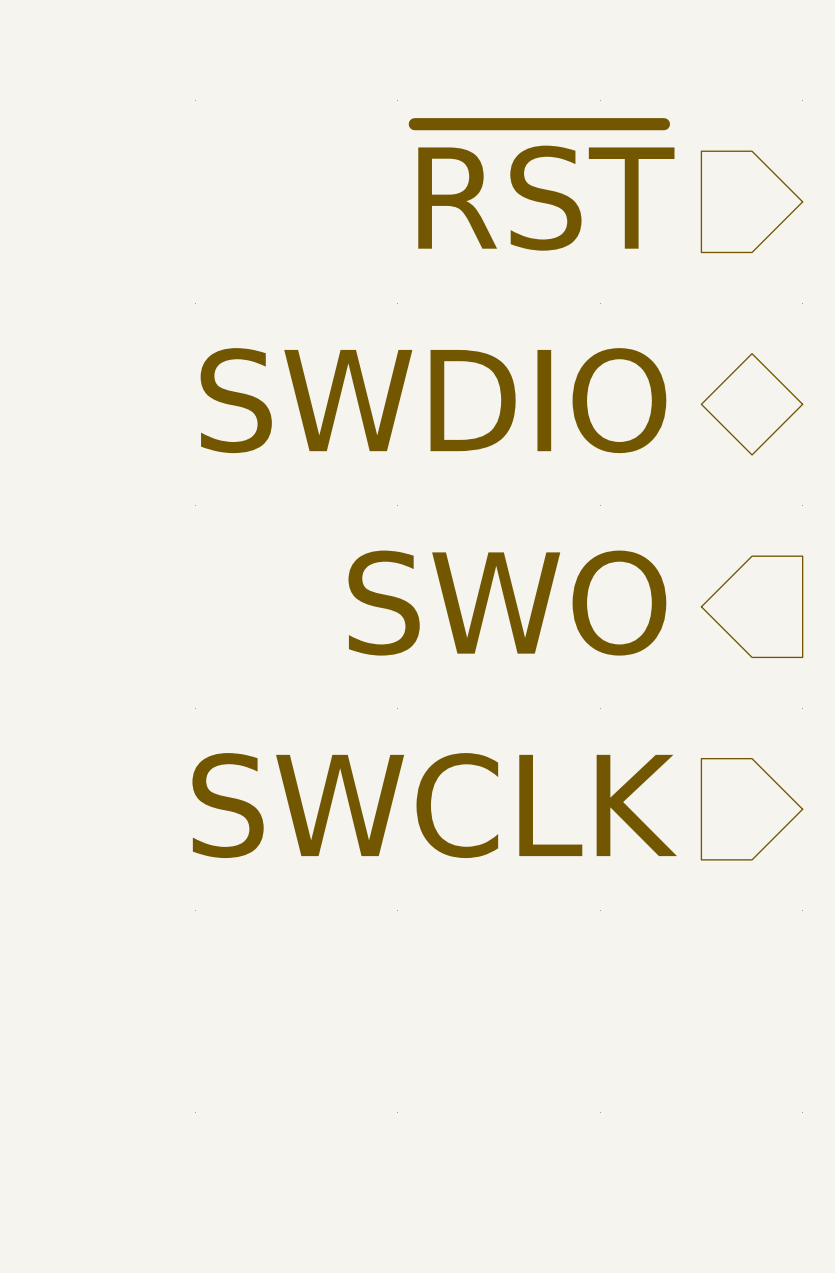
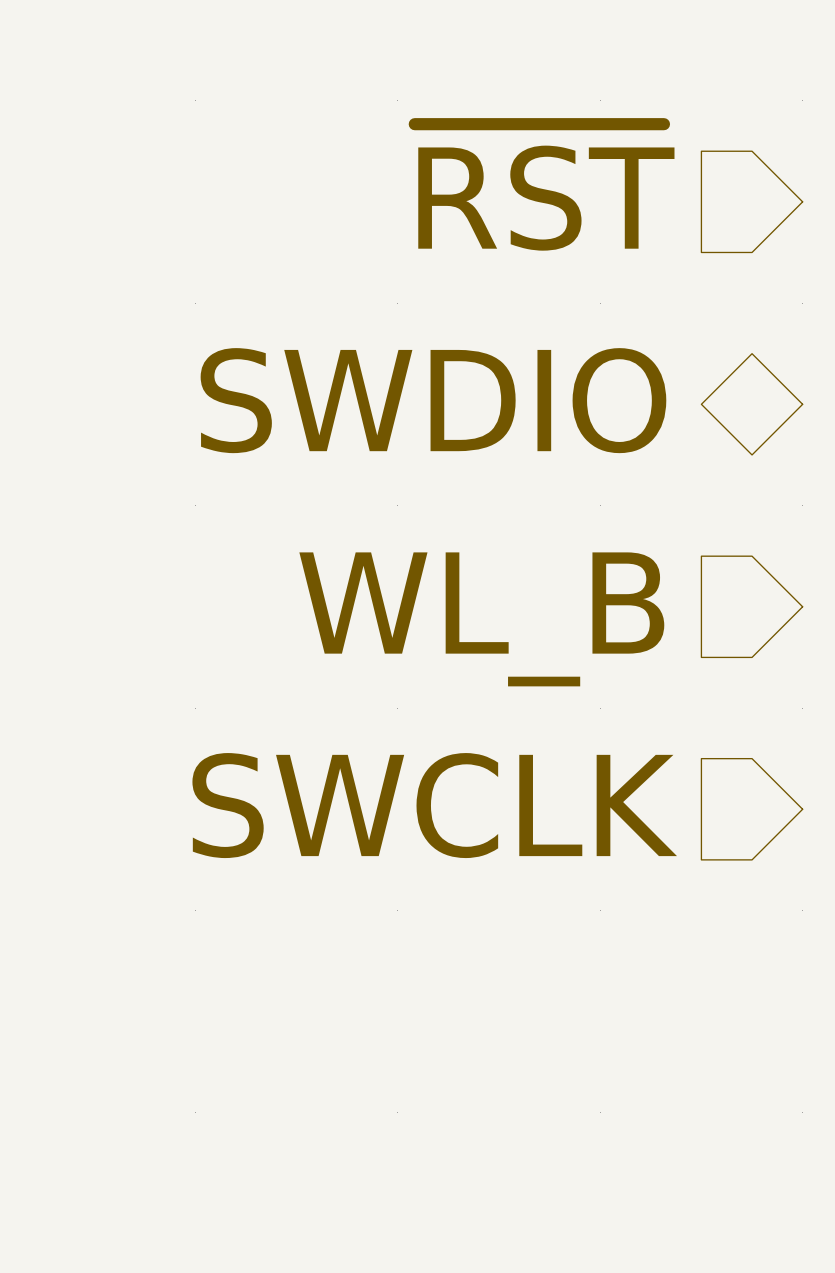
hierarchical label shape: output (507, 603) -> input (481, 619)
hierarchical label: SWO (507, 603) -> WL_B (481, 619)

